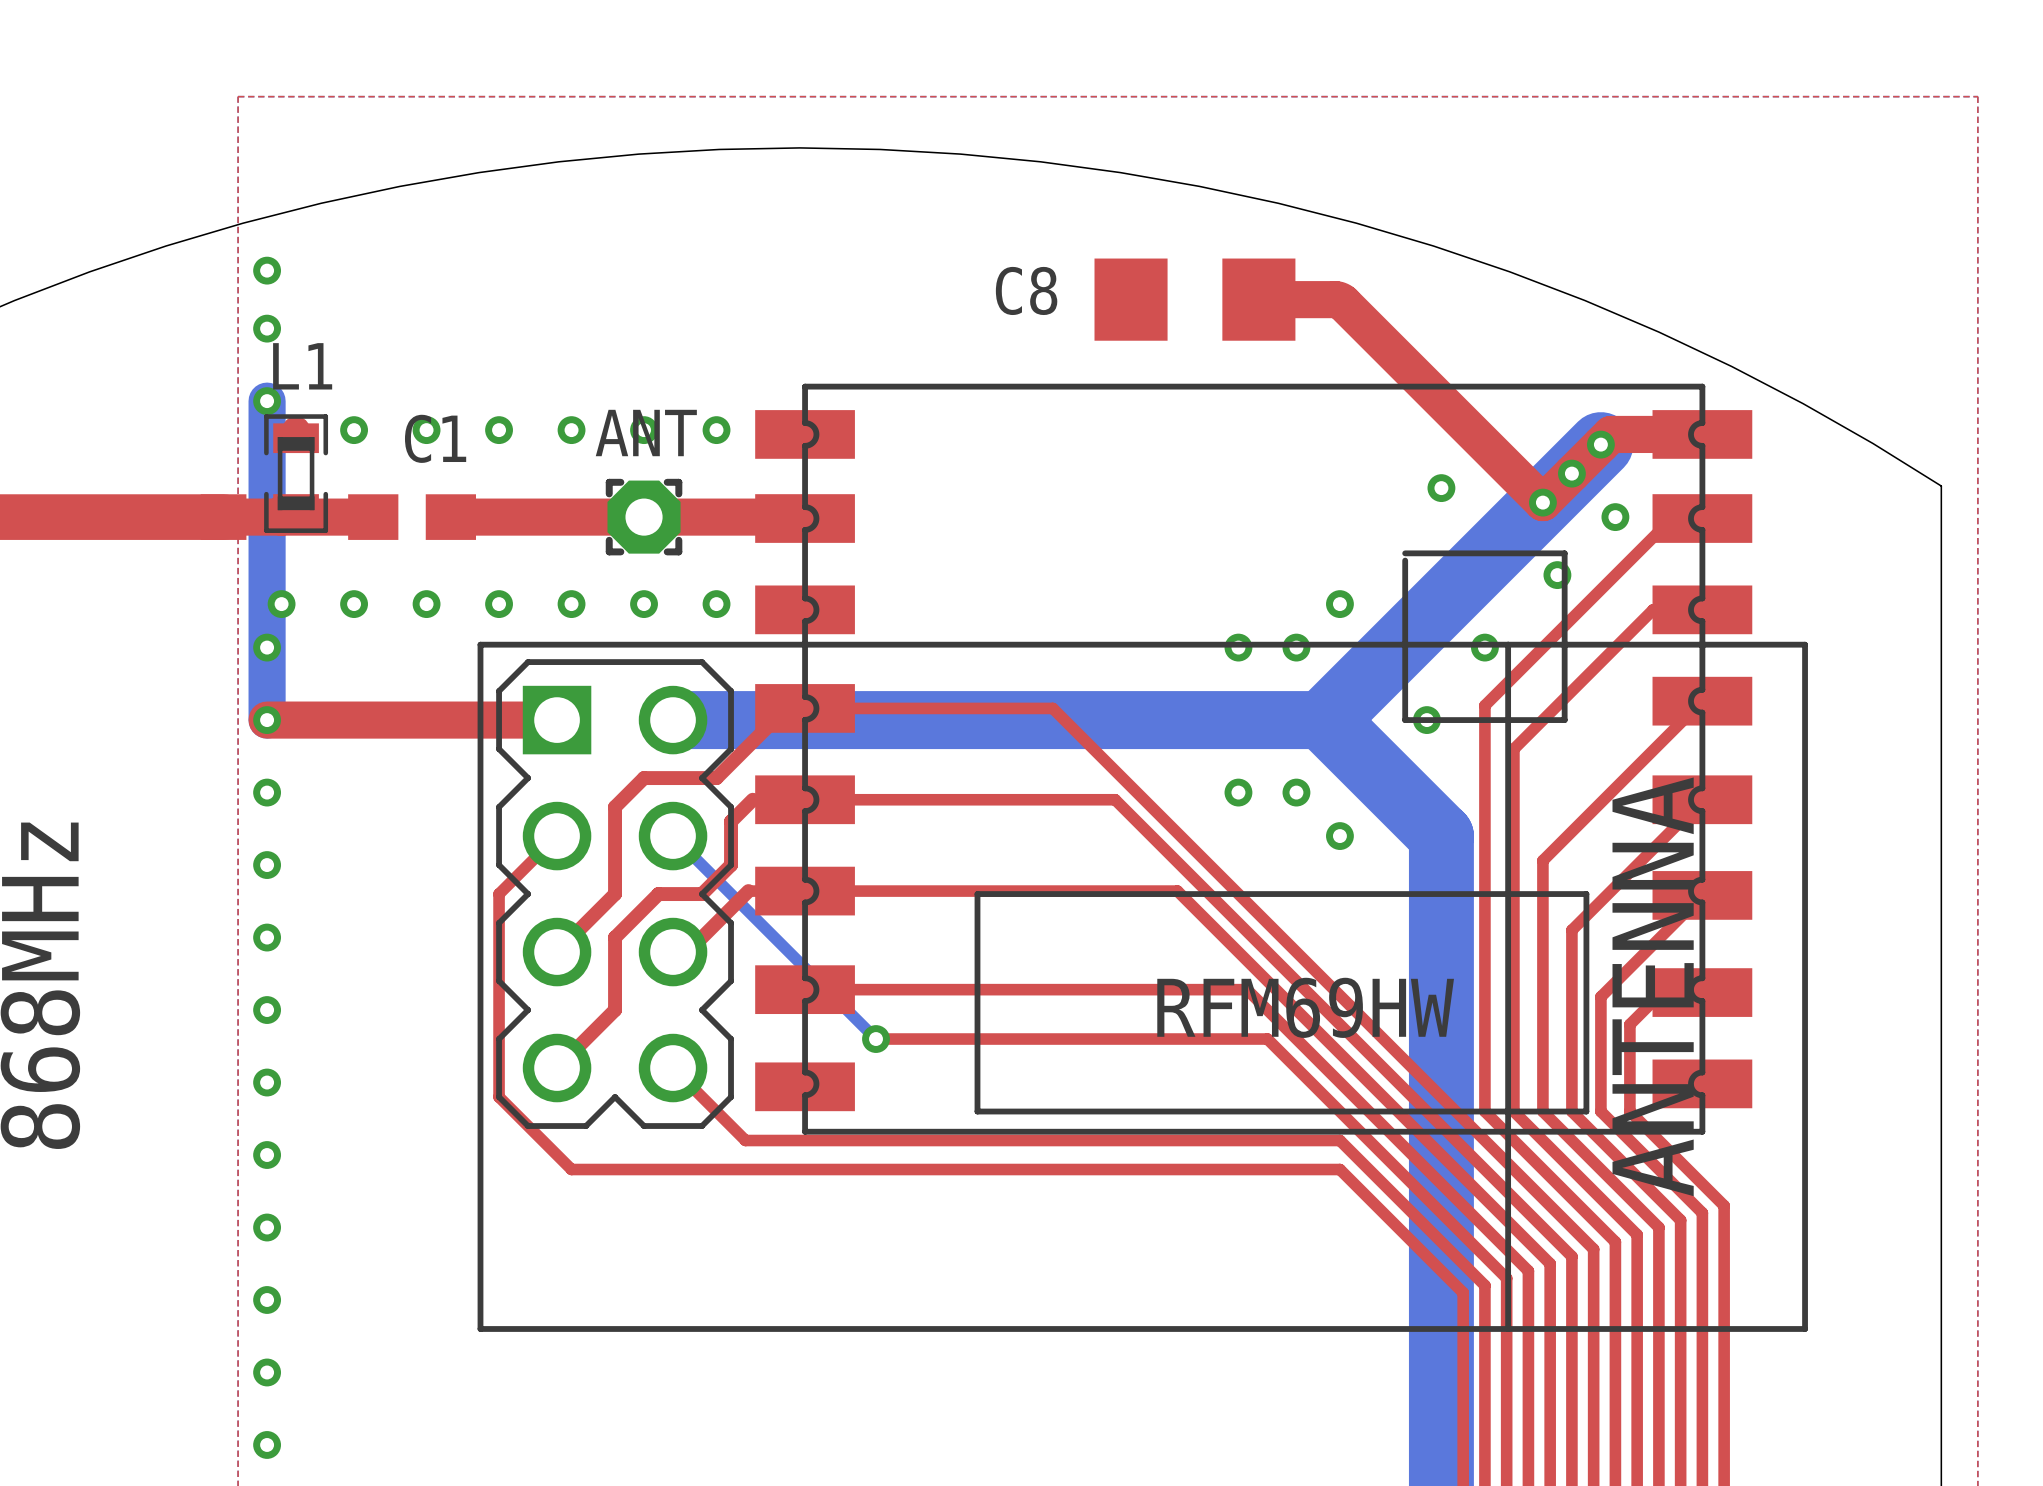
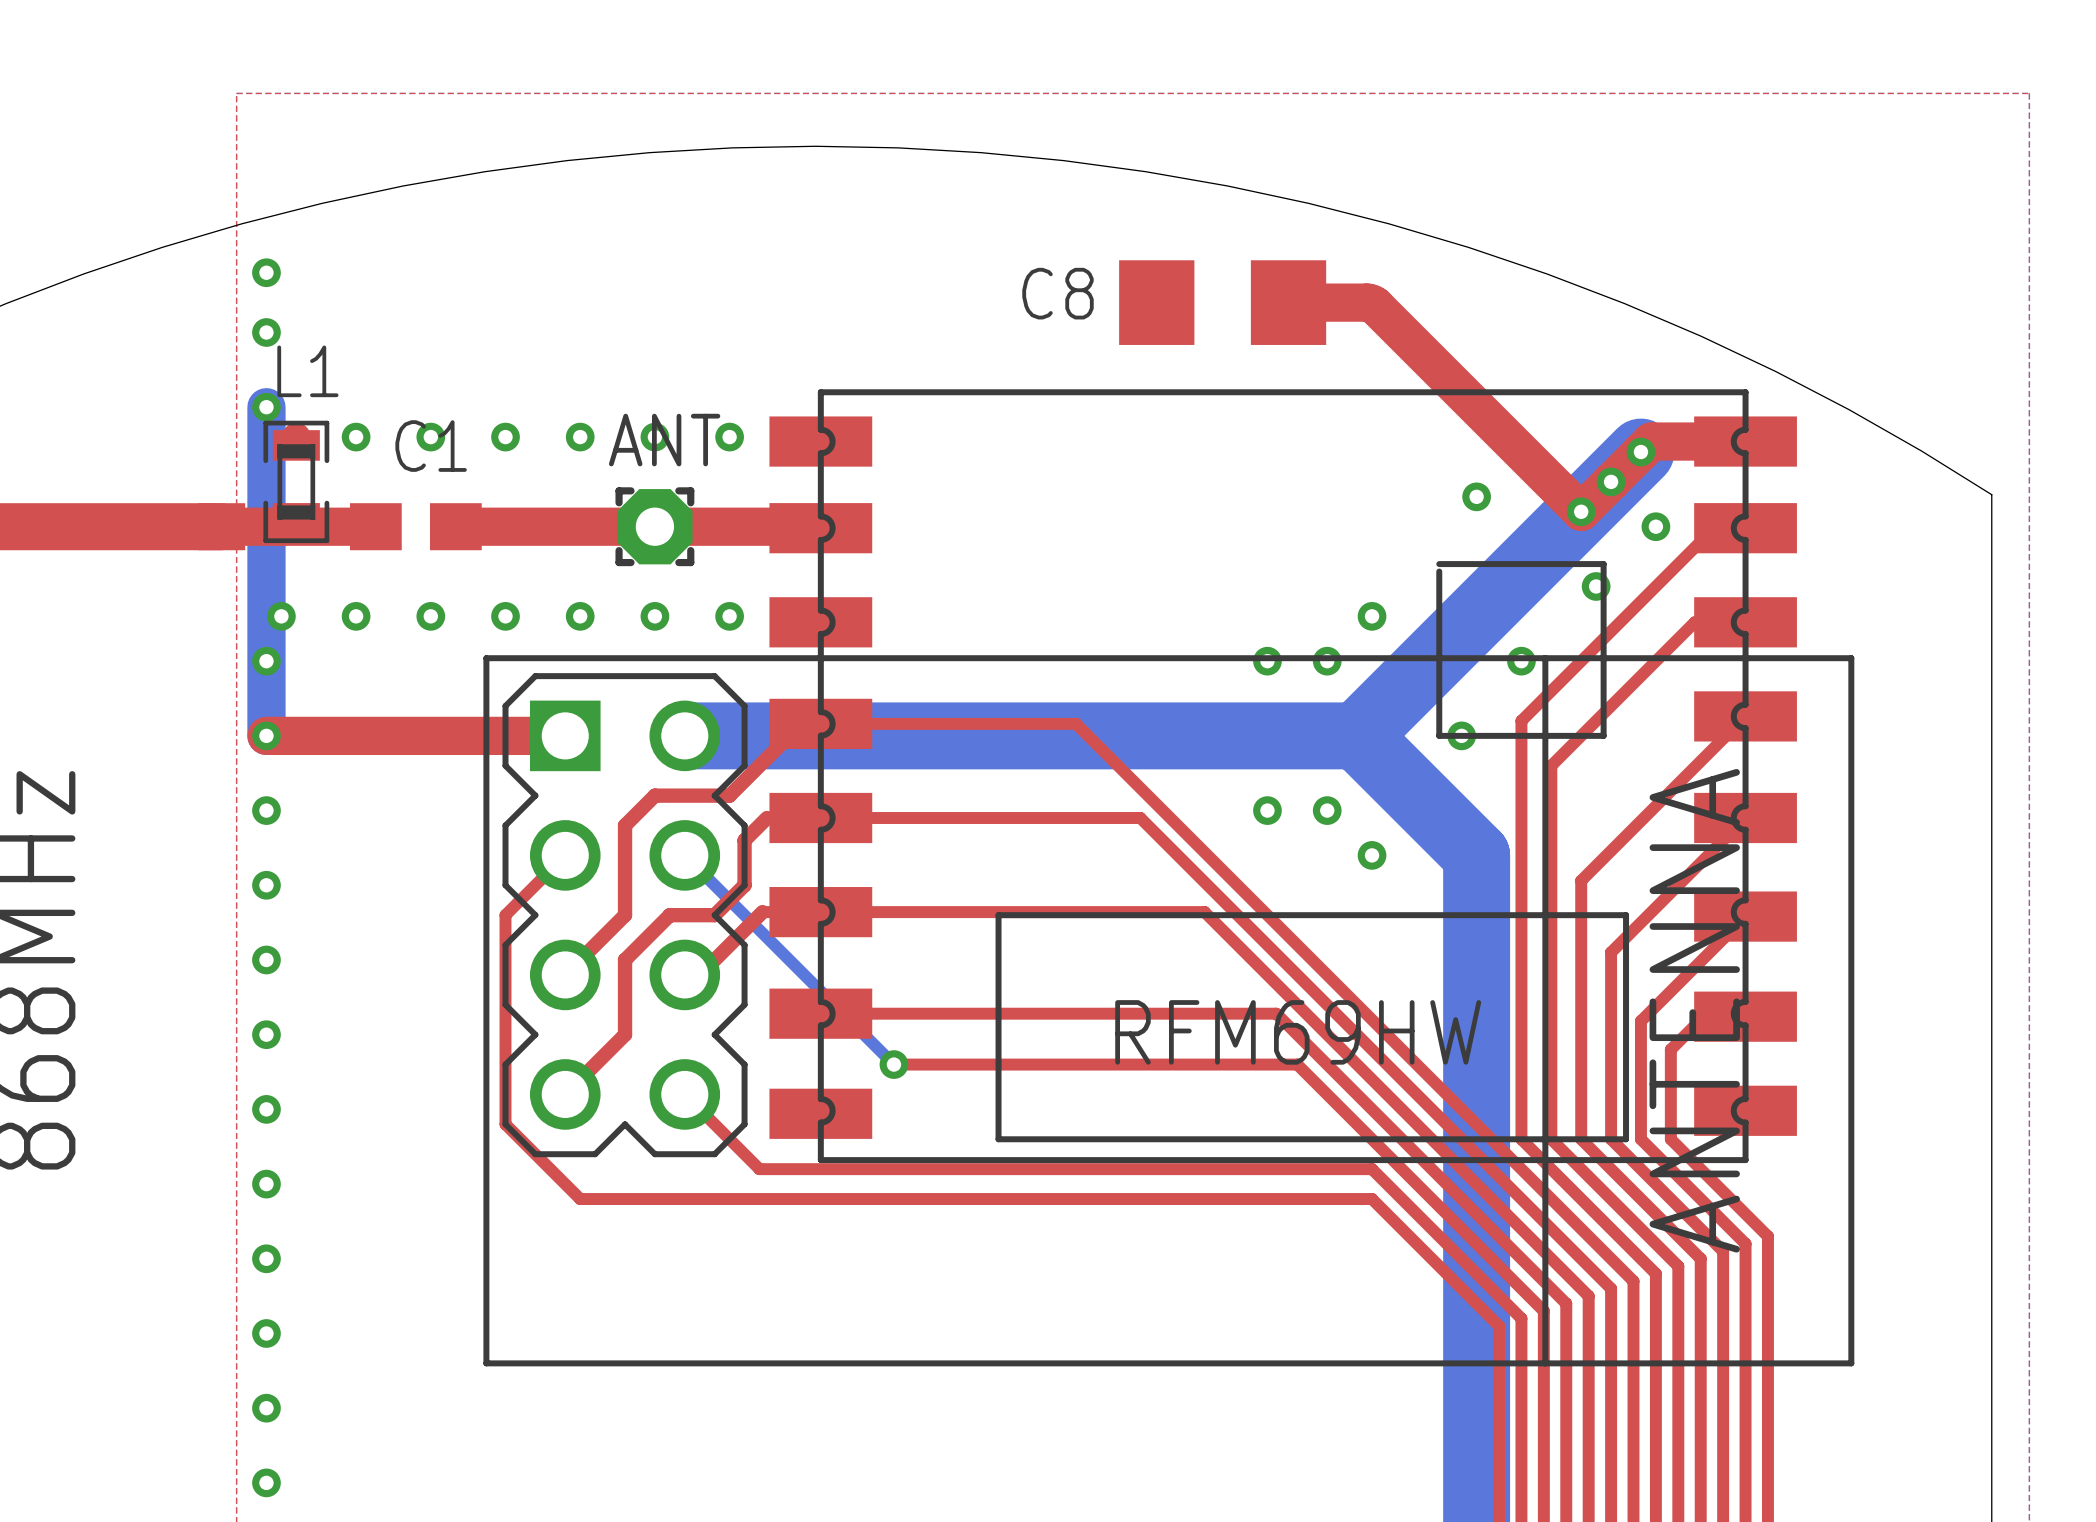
bottom track width: thin (673, 720) (1325, 720) -> thick (684, 735) (1357, 735)

